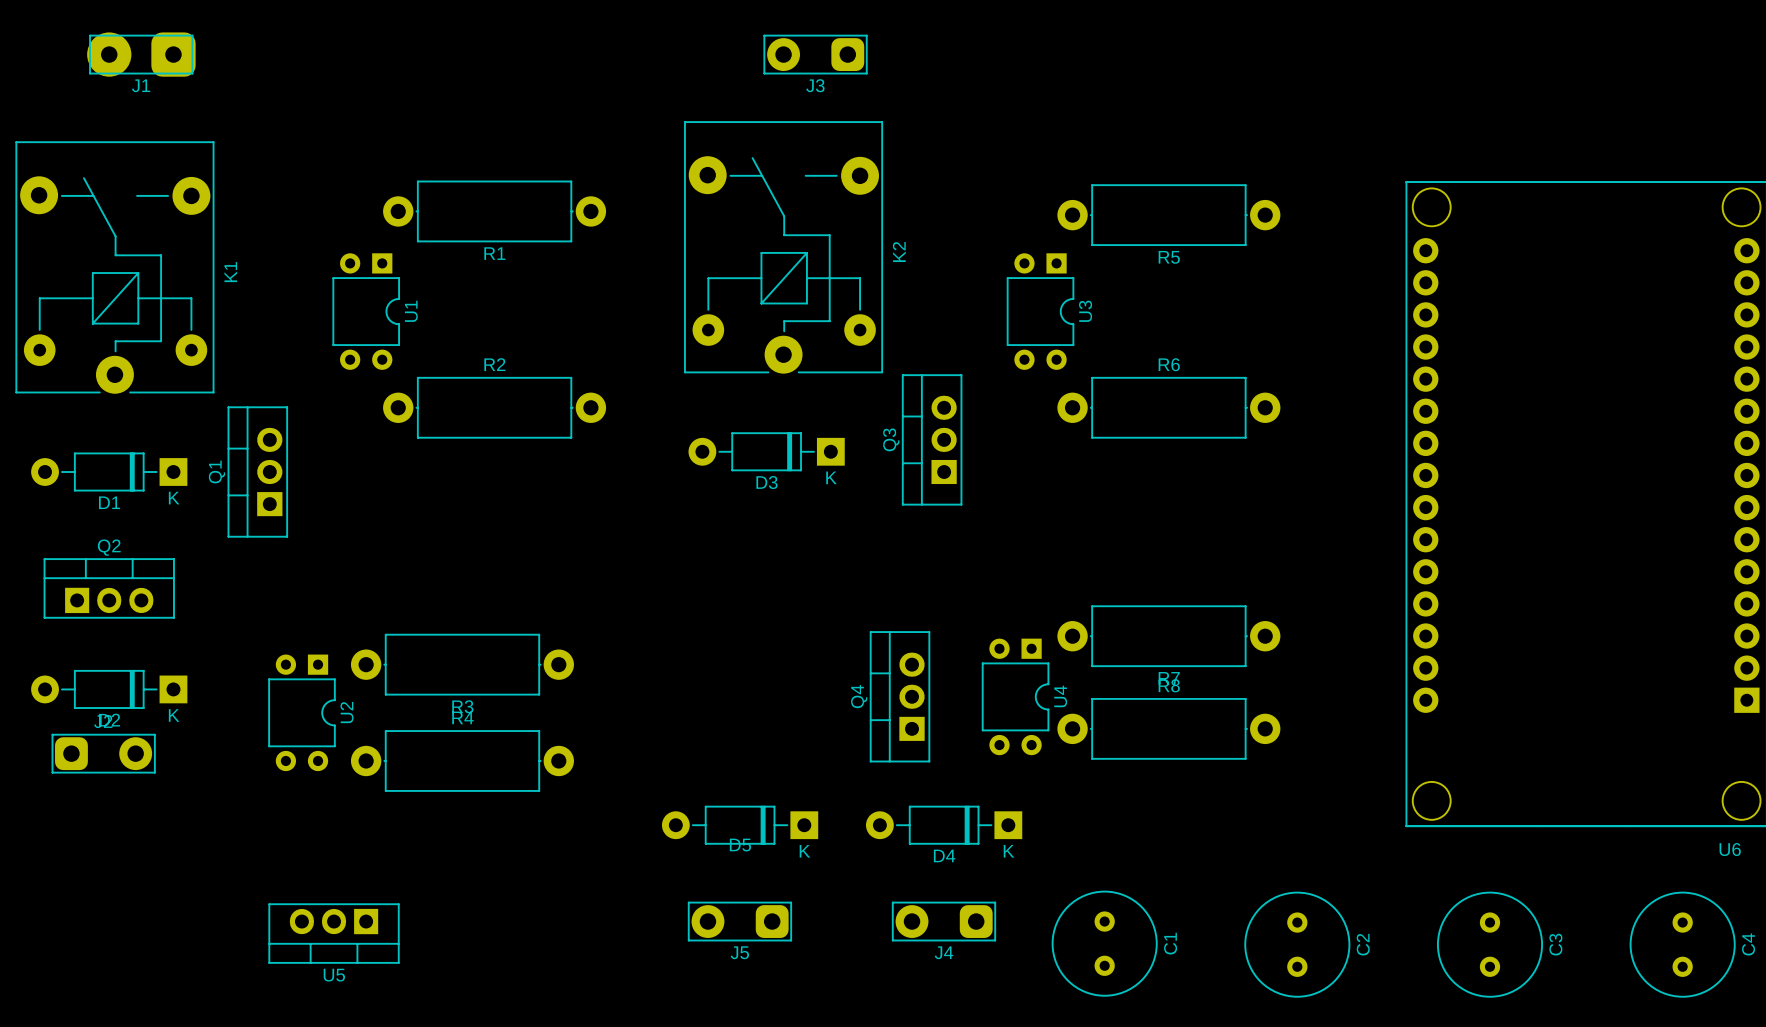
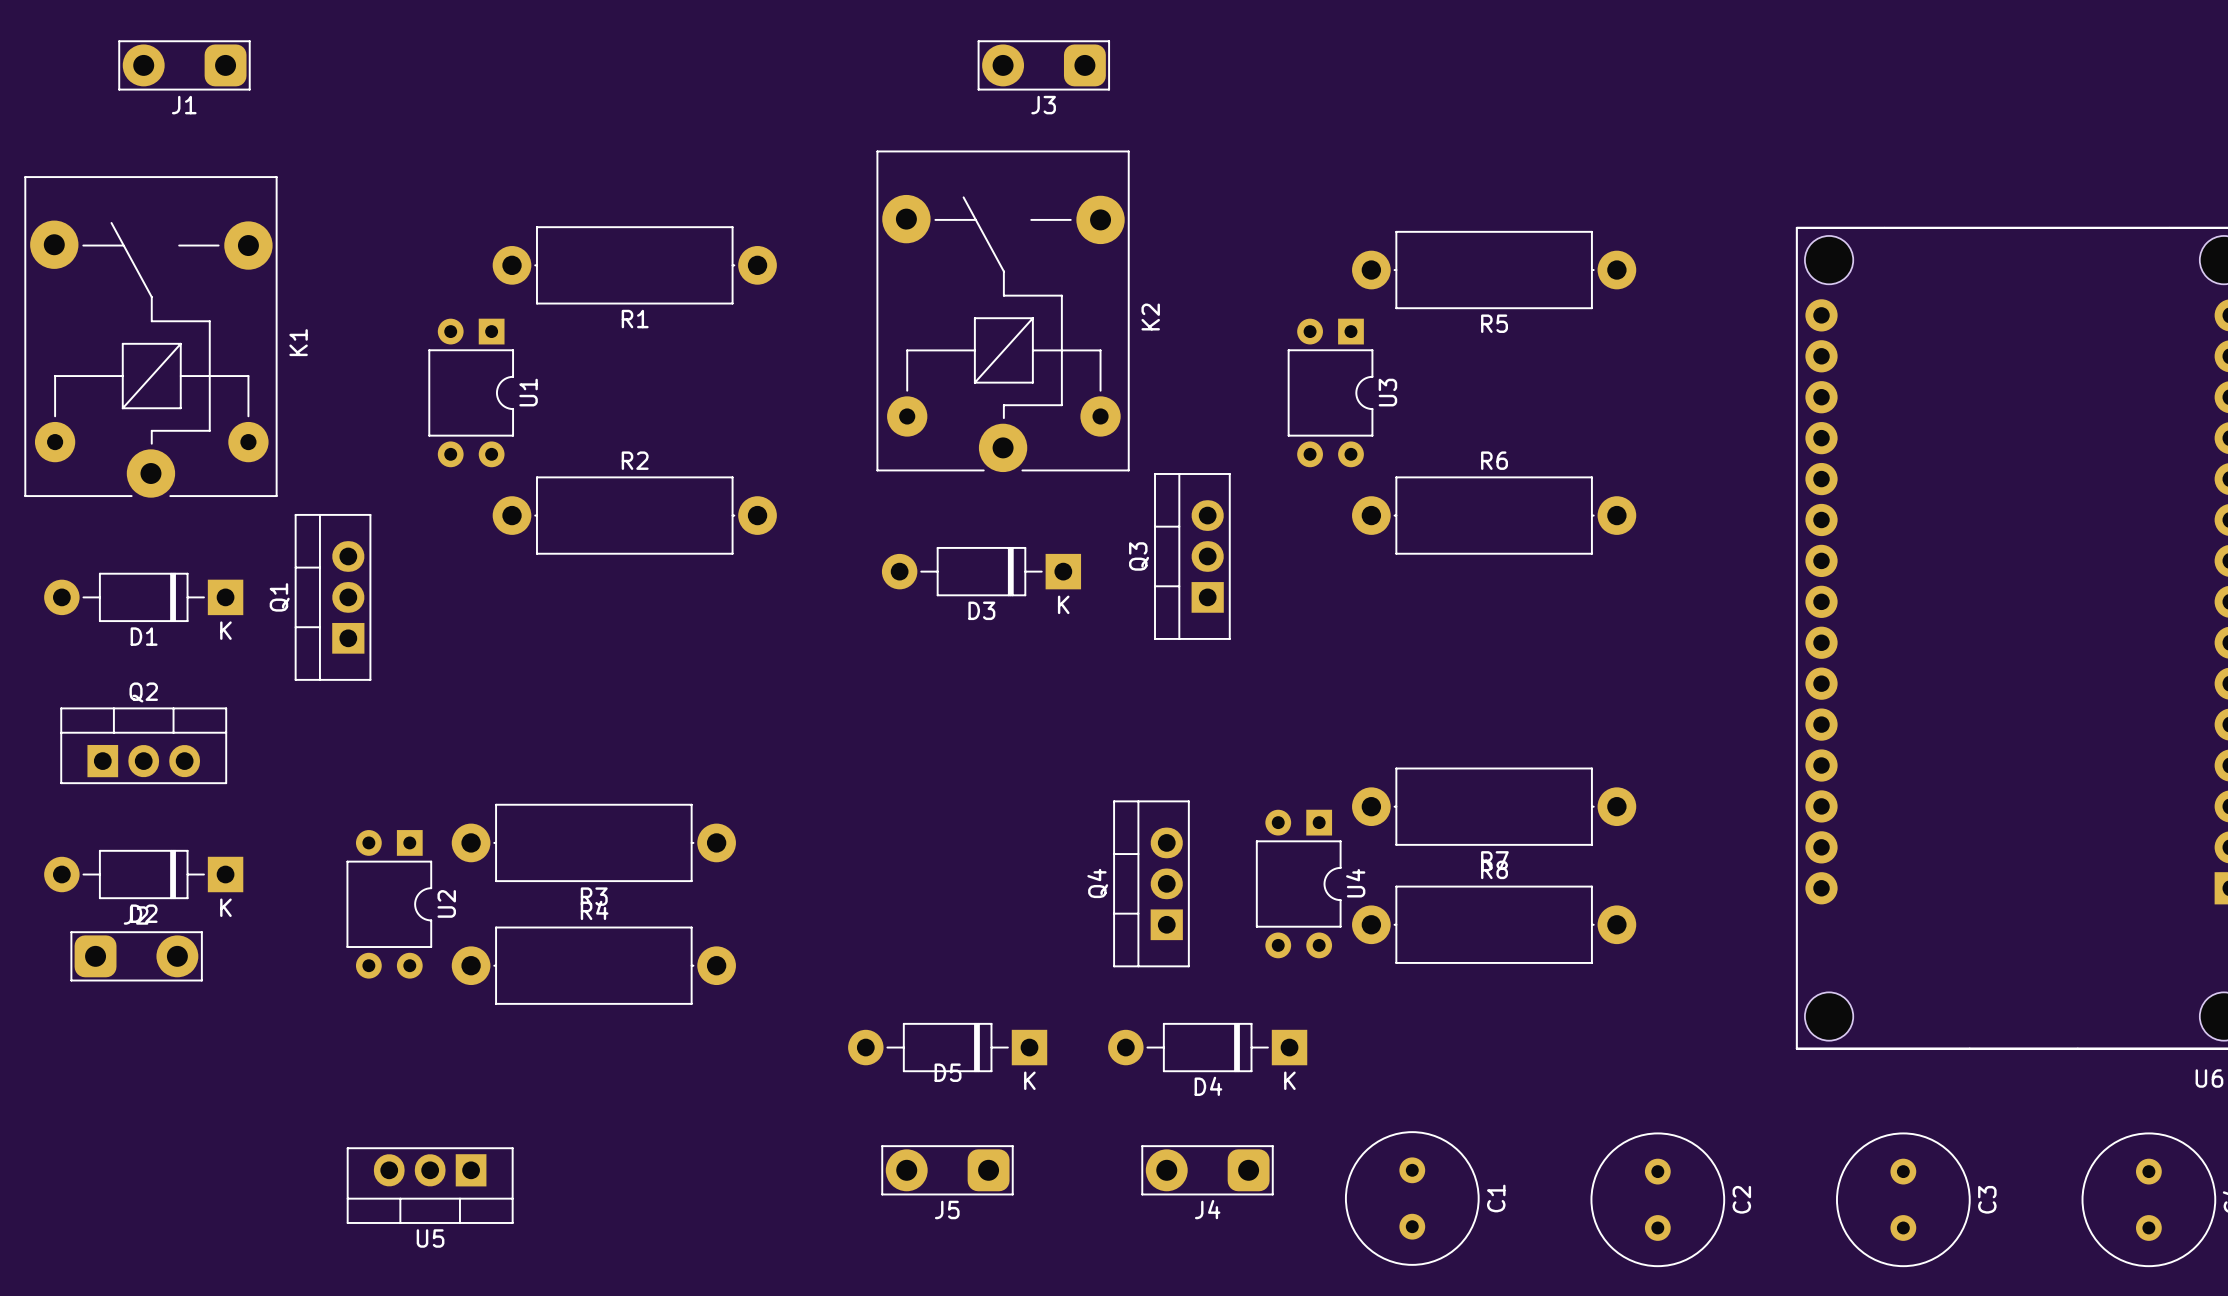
J1 footprint: [87, 32, 196, 77] -> [118, 40, 251, 91]

